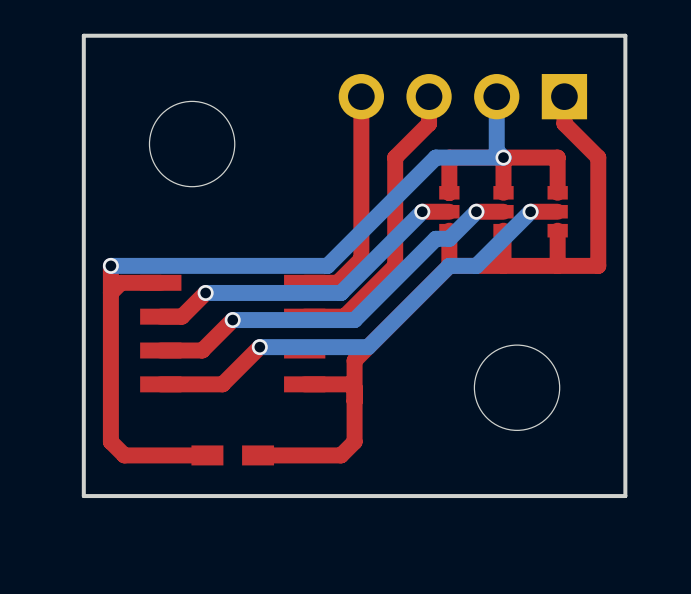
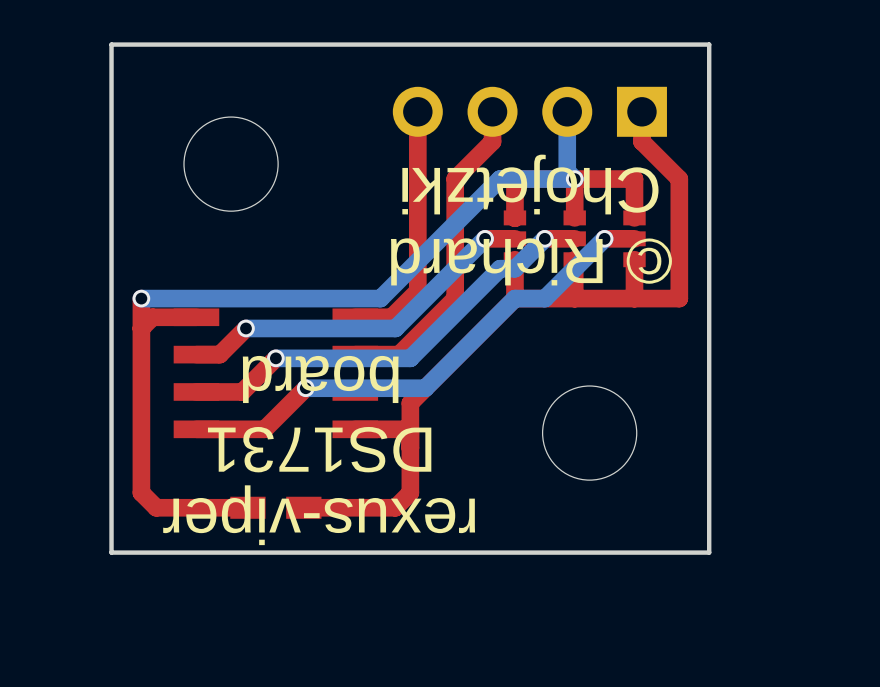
text: none -> Chojetzki (530, 184)
text: none -> © Richard (531, 261)
text: none -> board (320, 379)
text: none -> DS1731 (319, 449)
text: none -> rexus-viper (319, 515)

